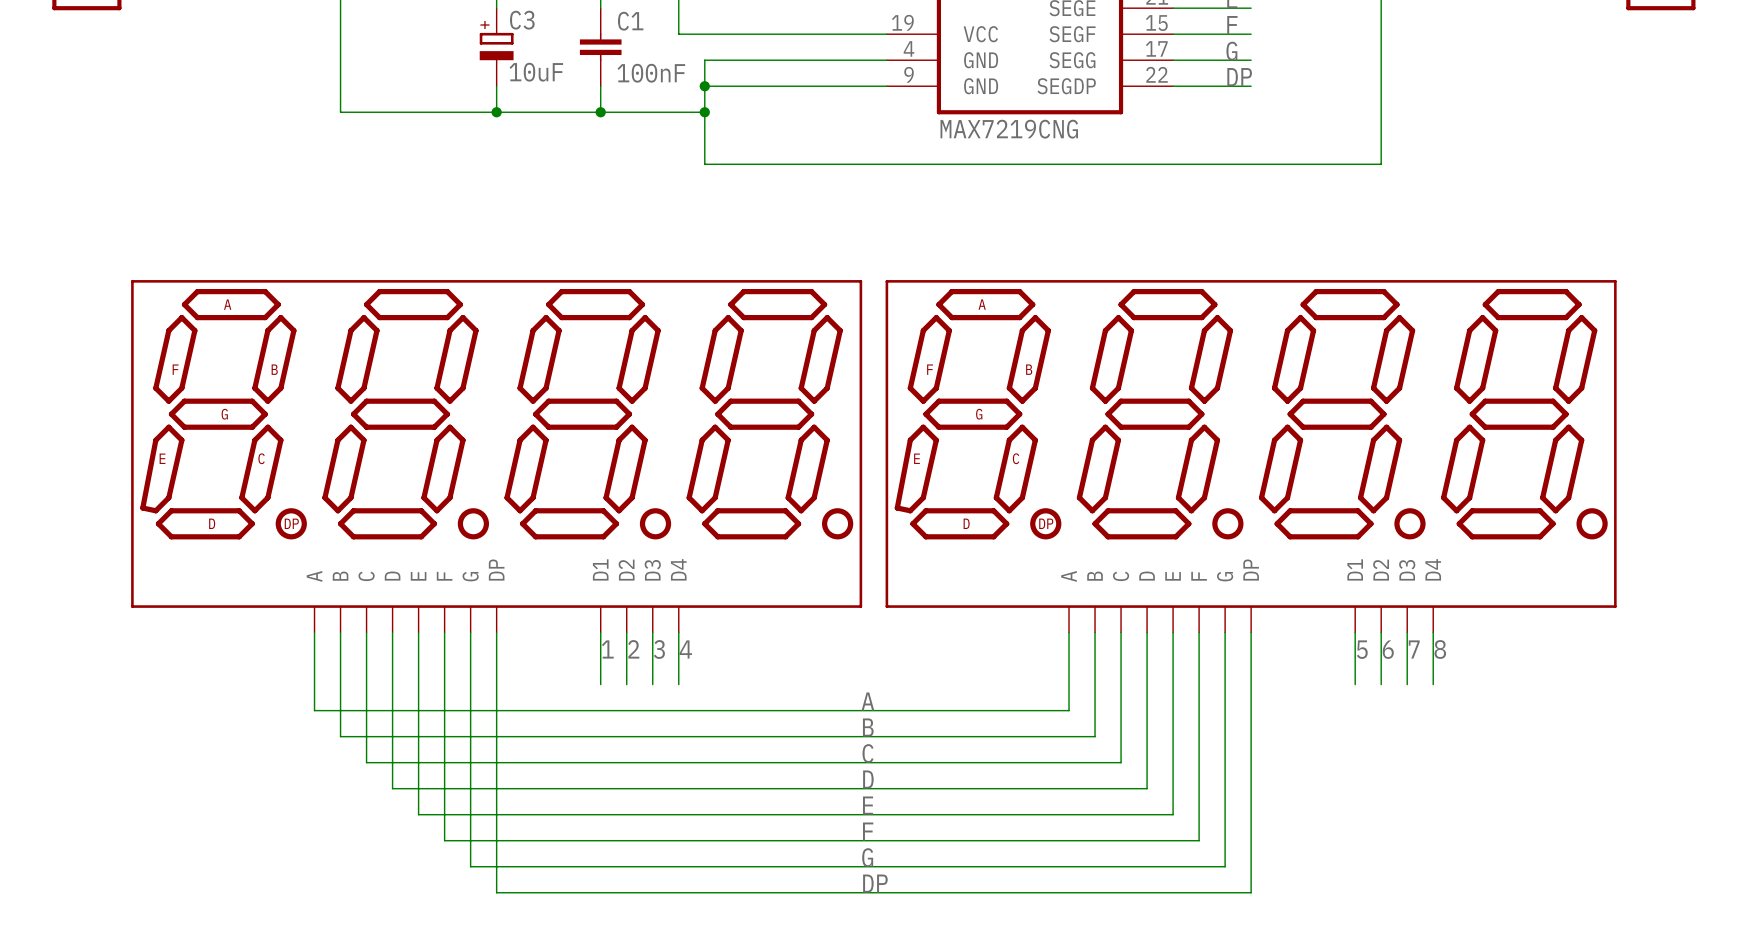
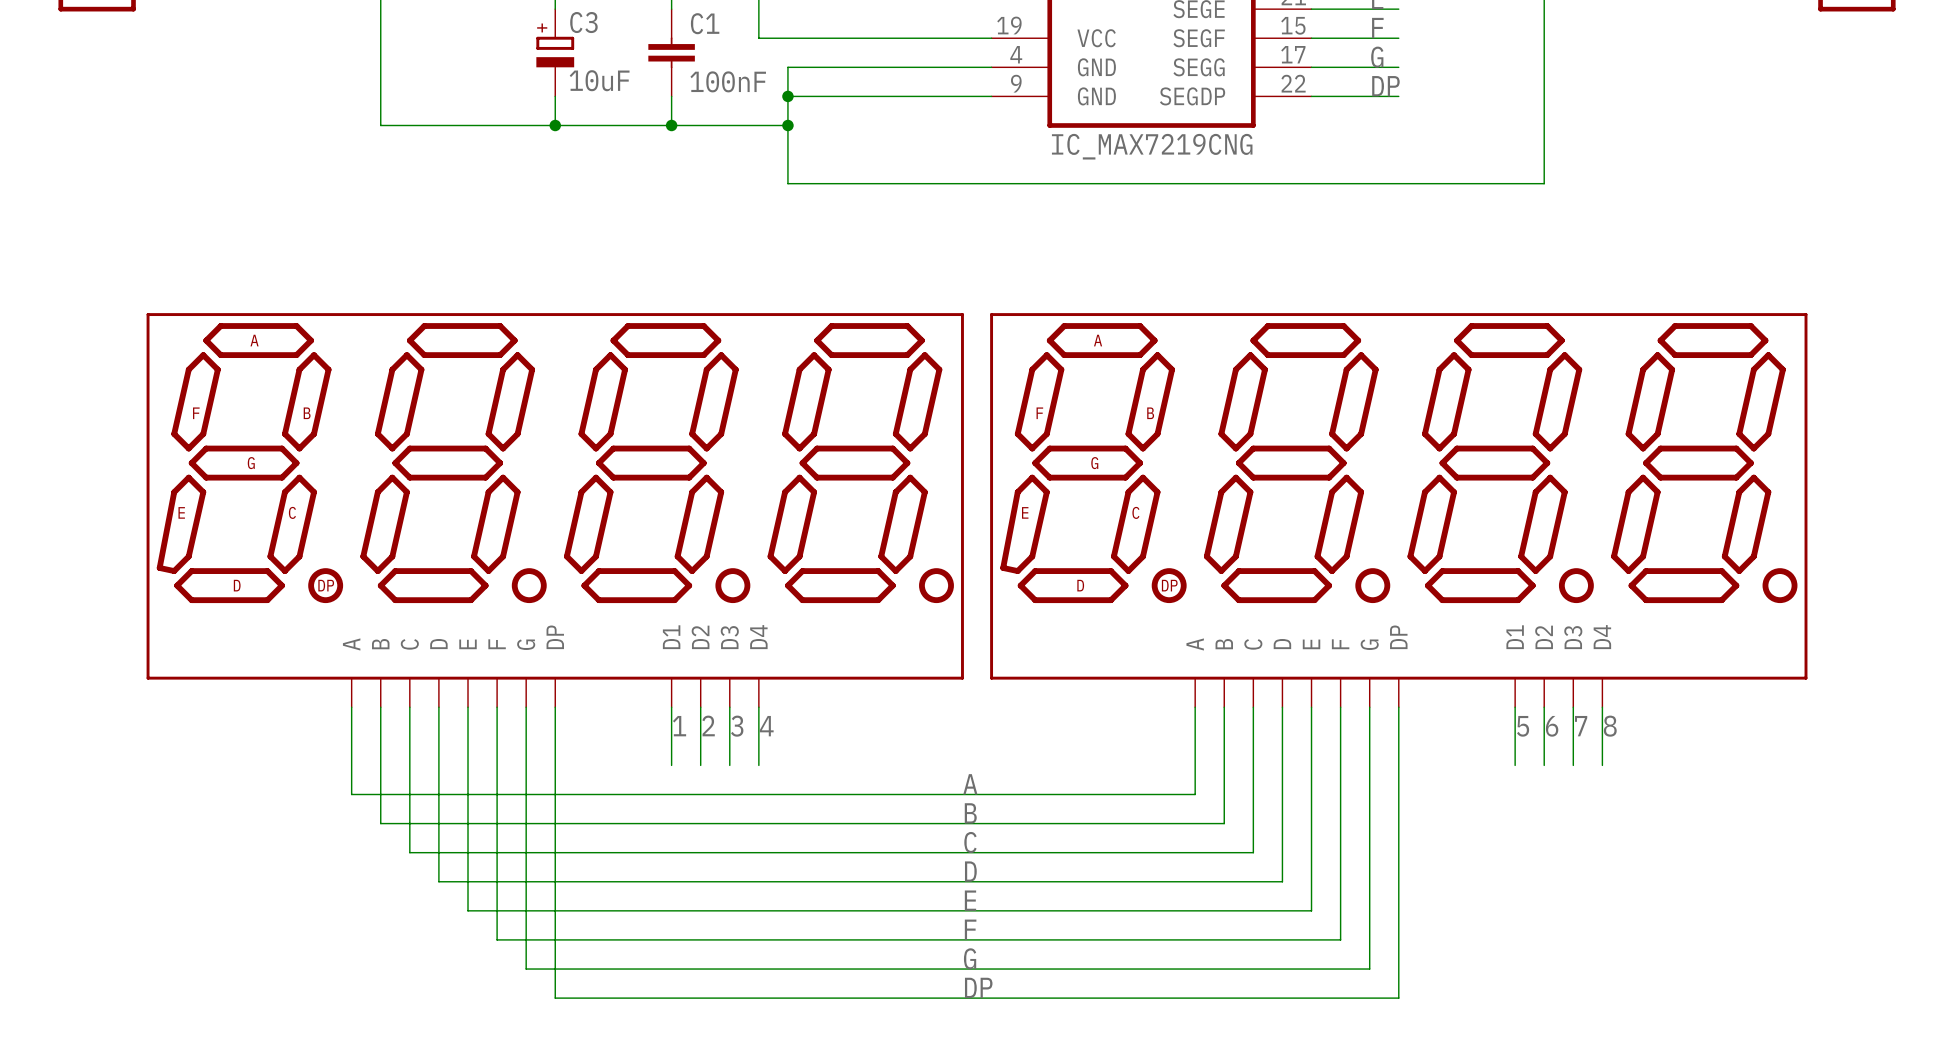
part value: MAX7219CNG (1009, 129) -> IC_MAX7219CNG (1152, 146)

